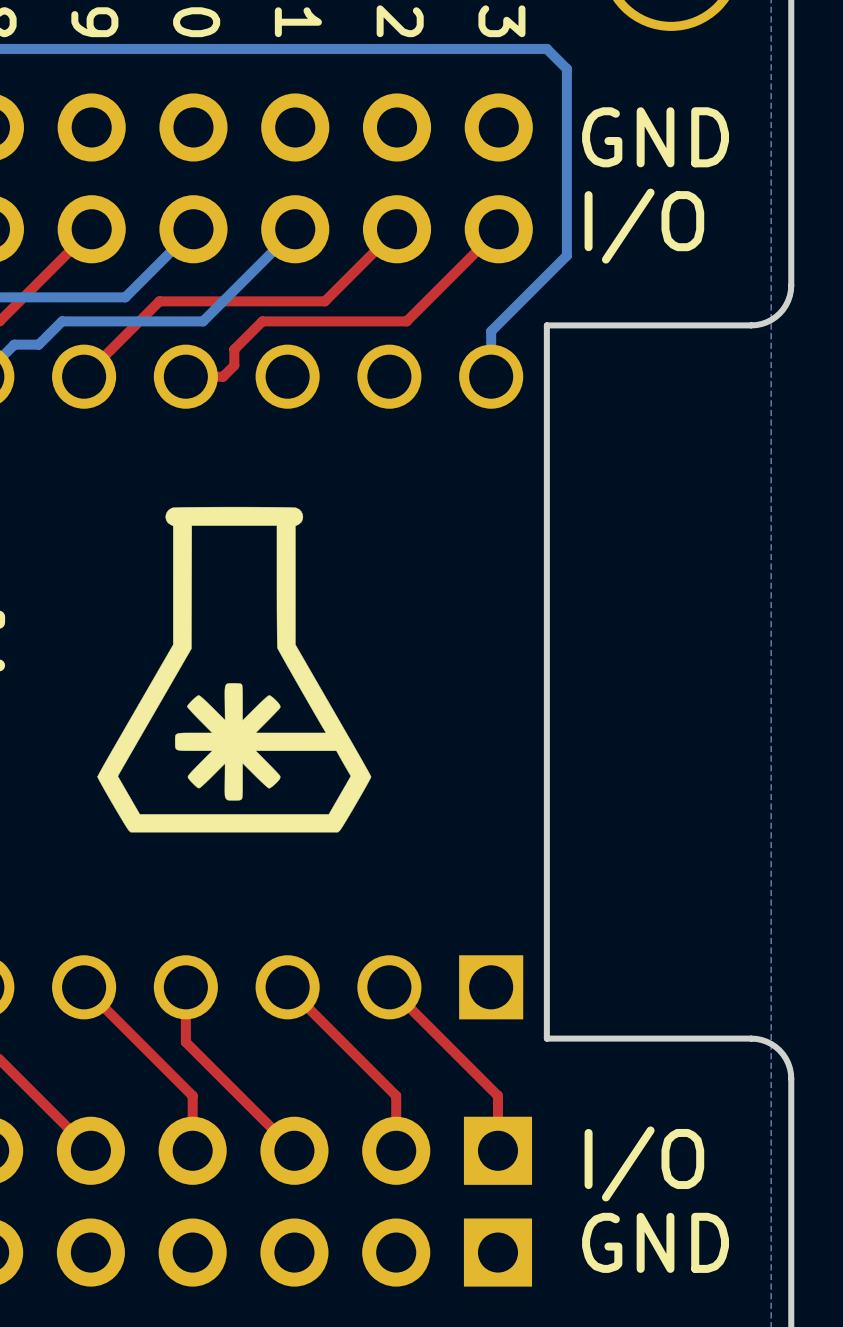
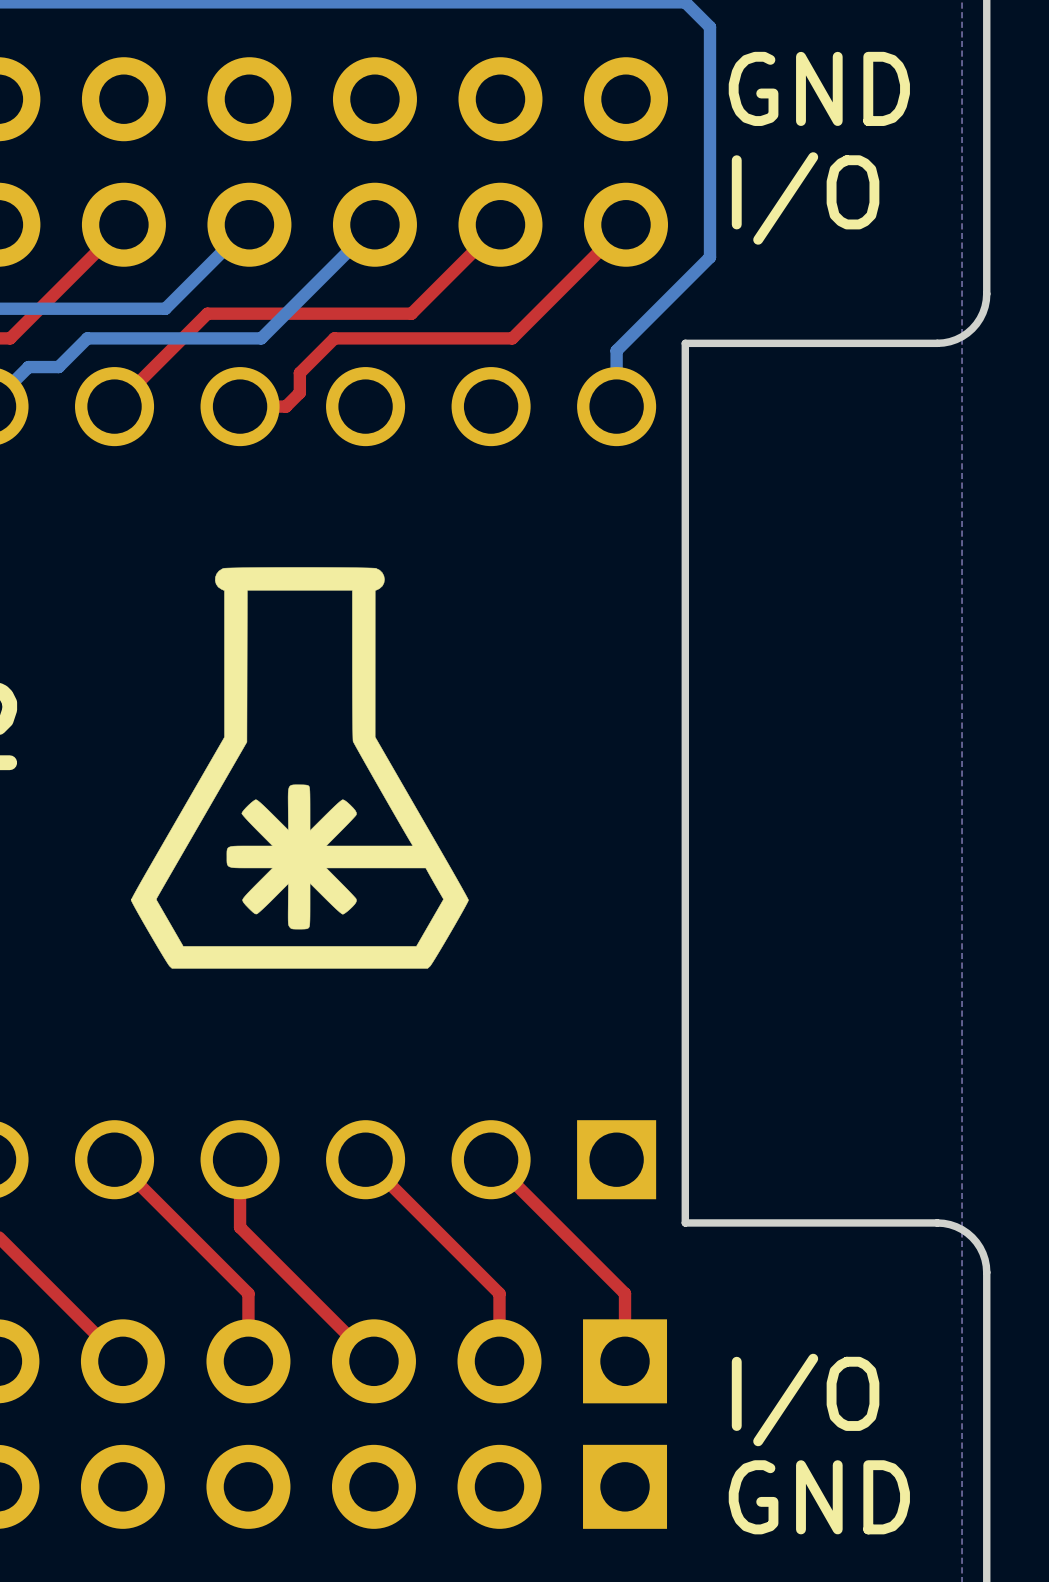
text position: GND (655, 137) -> GND (819, 88)
text position: I/O (644, 226) -> I/O (805, 198)
text position: I/O (644, 1163) -> I/O (805, 1399)
text position: GND (655, 1242) -> GND (819, 1497)

